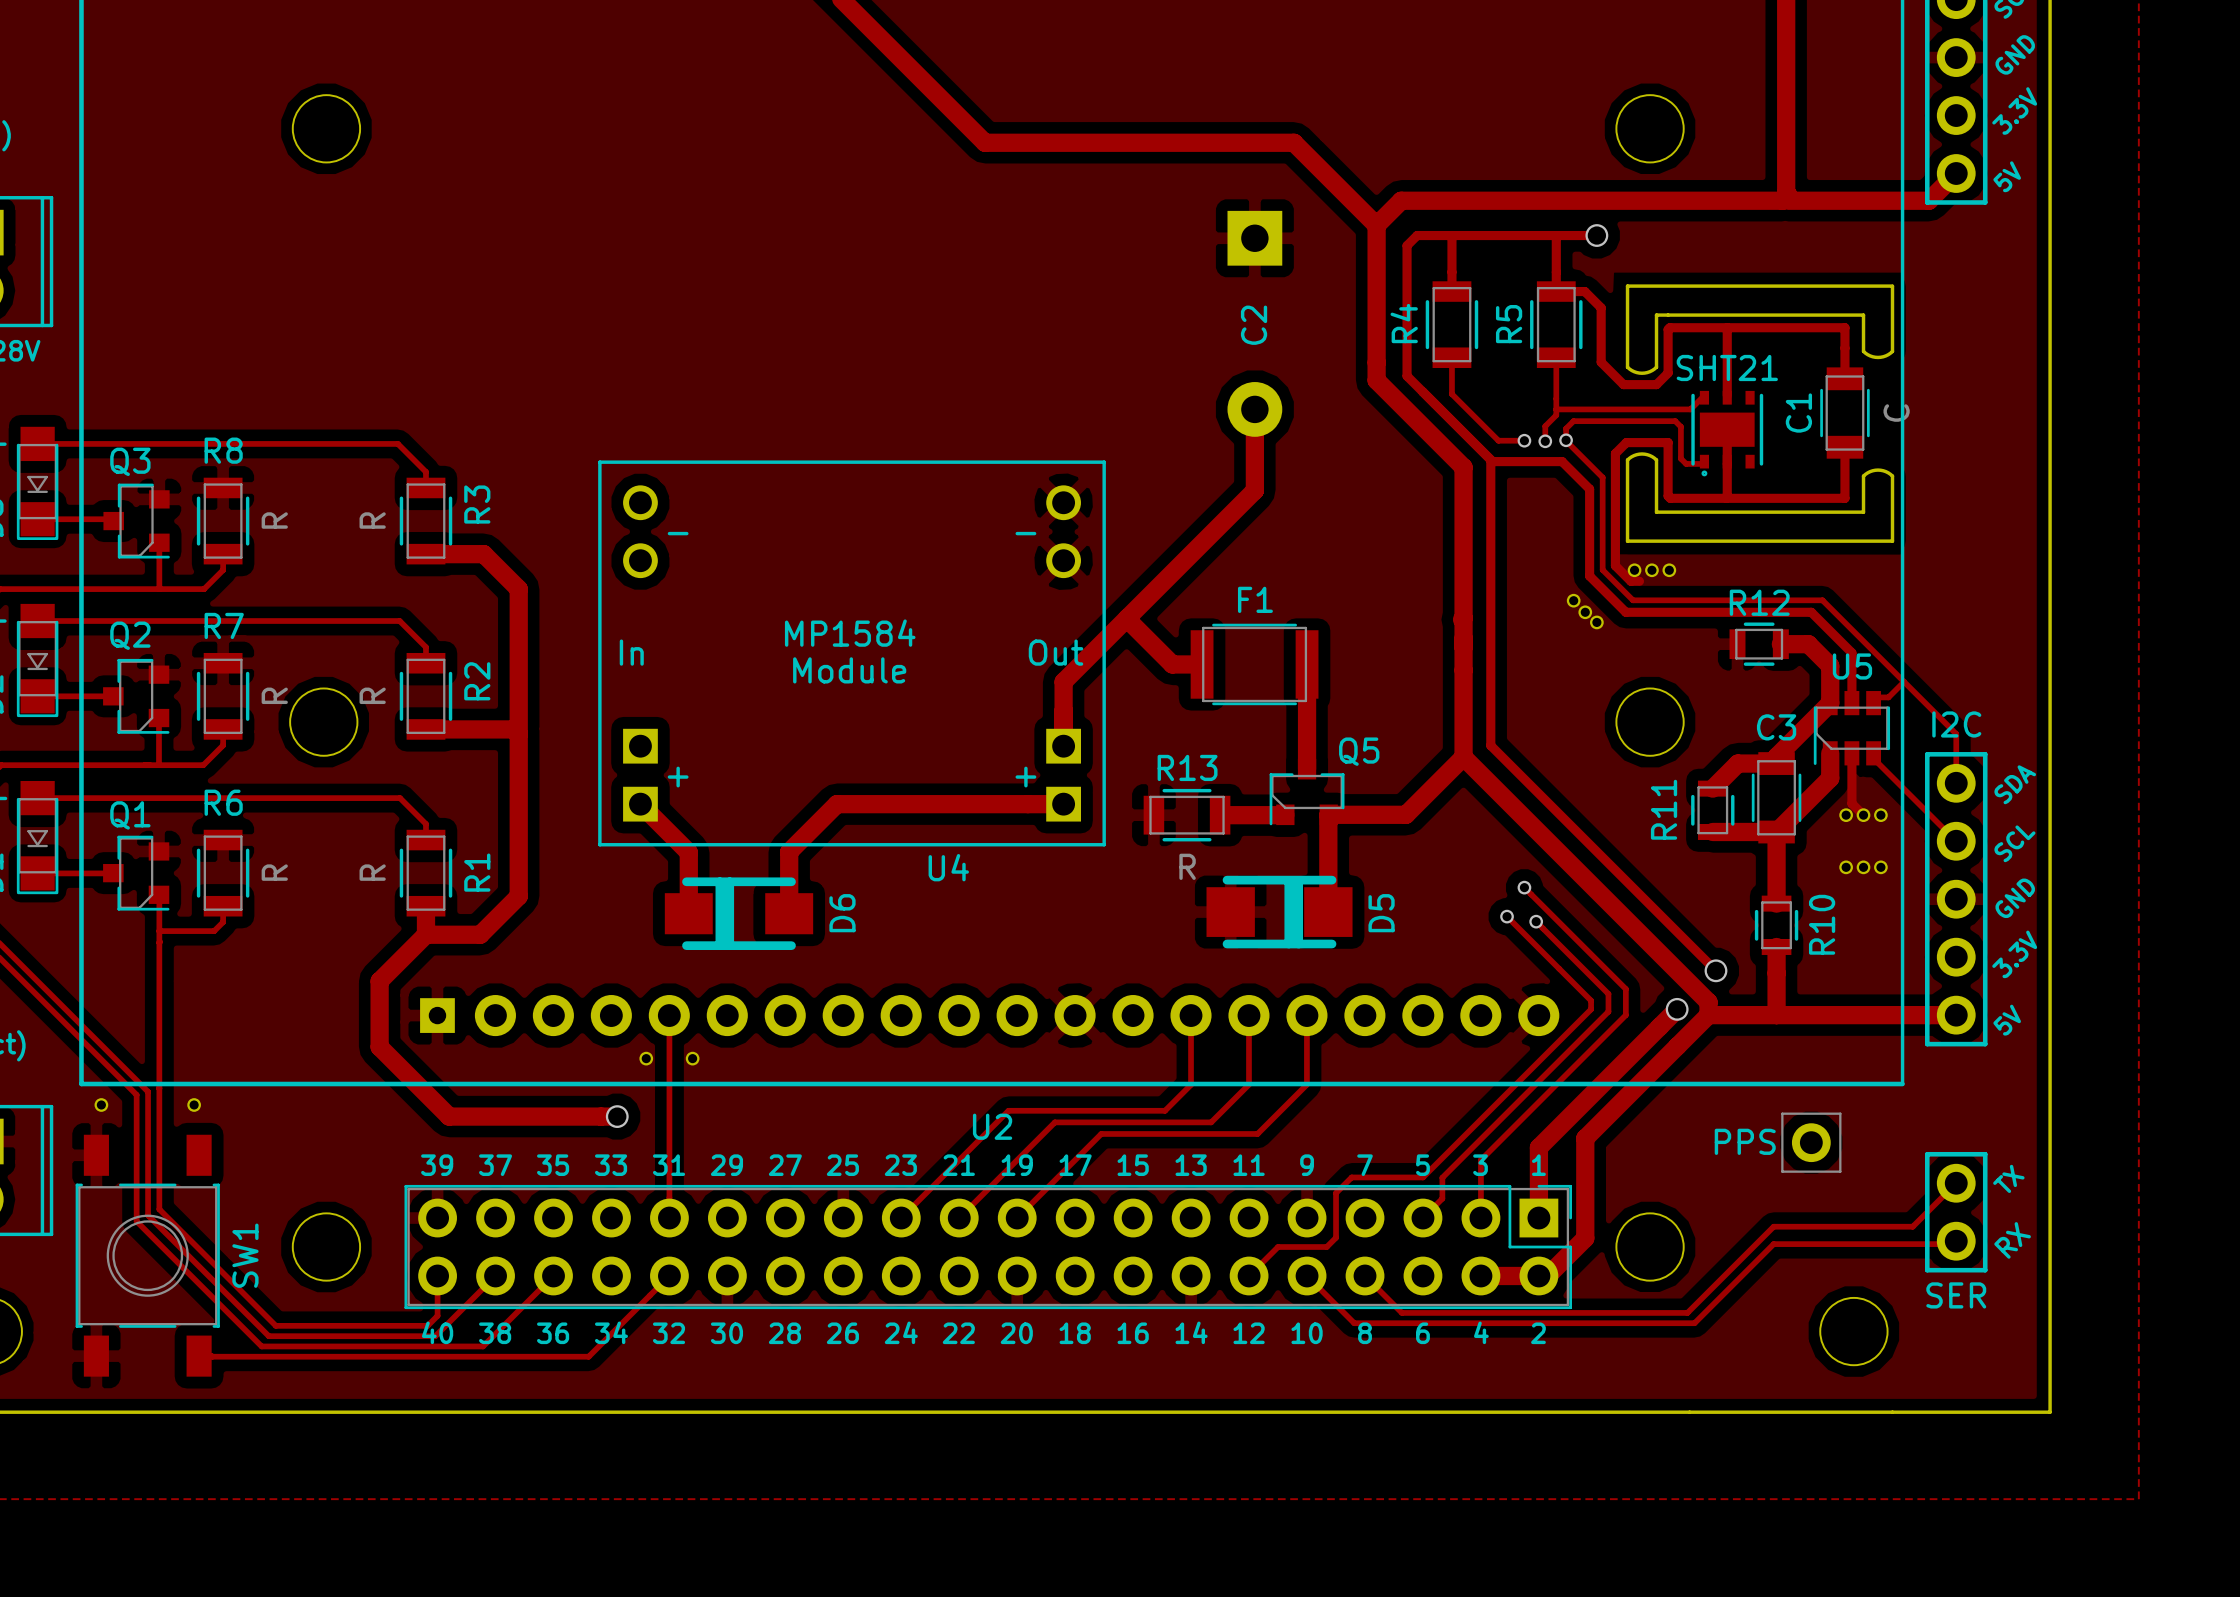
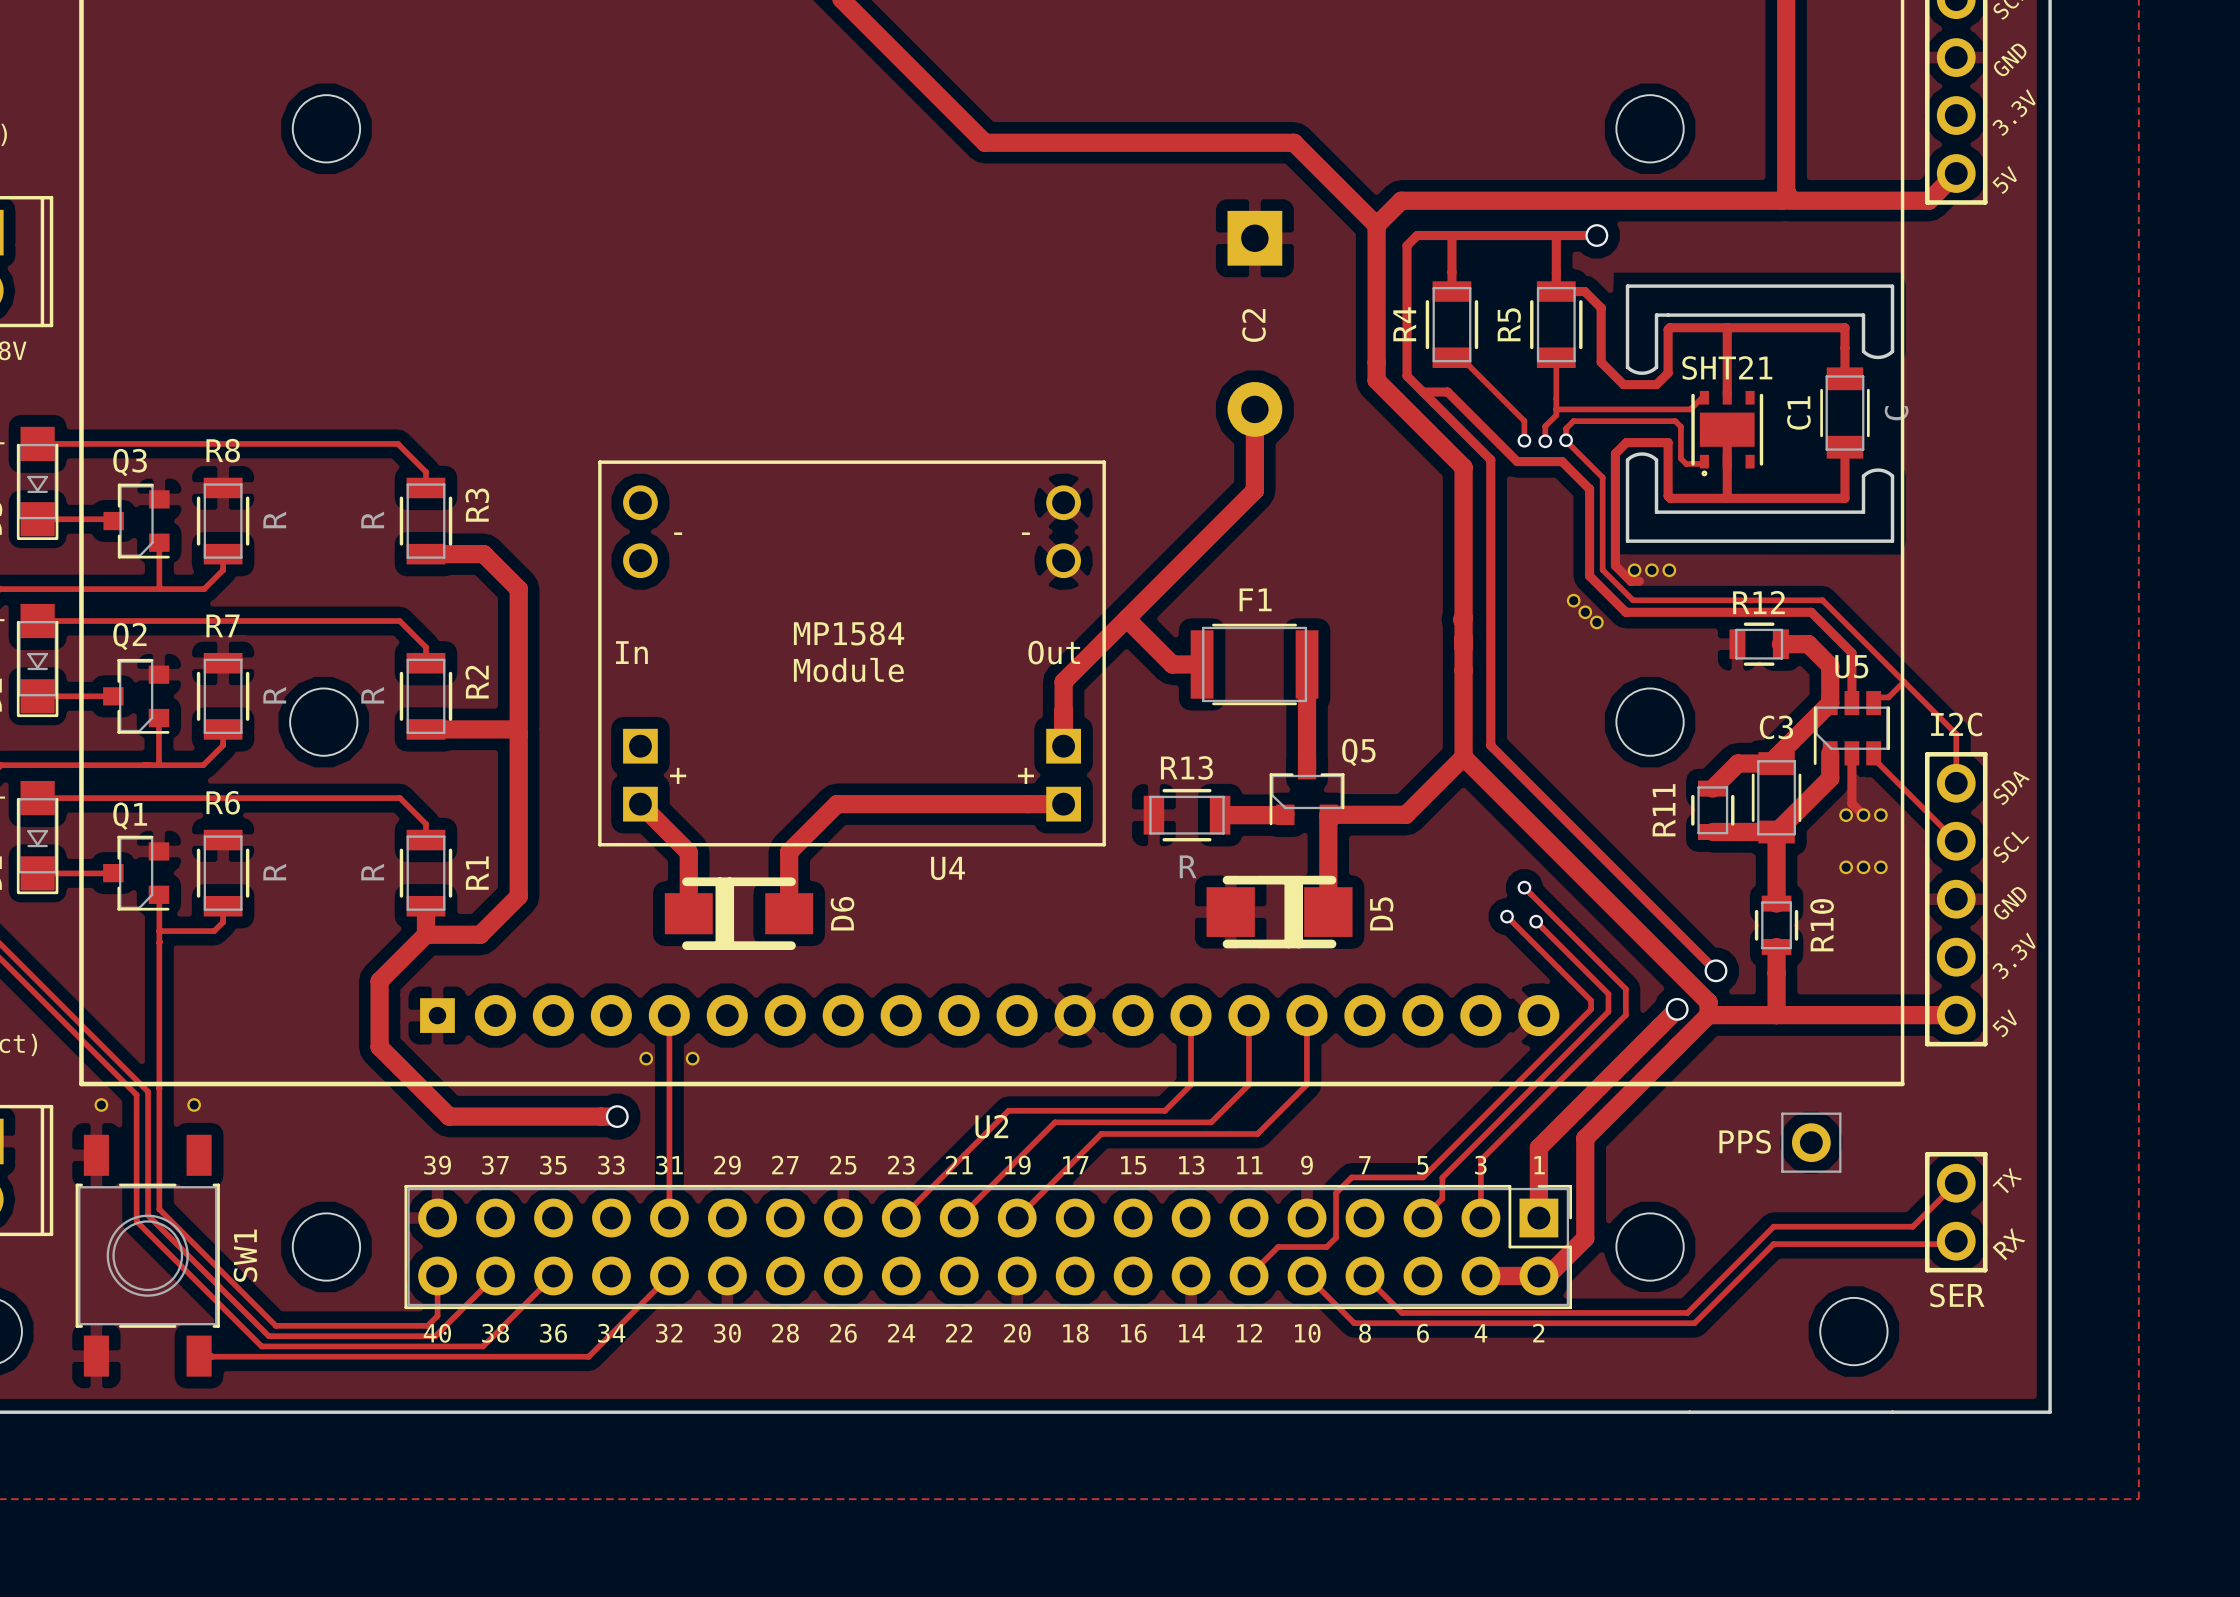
track: (1451, 357) (1451, 394) (1498, 440) (1523, 440) -> (1451, 357) (1461, 357) (1524, 421) (1524, 440)
track: (1490, 459) (1492, 461) (1517, 461) -> (1422, 392) (1447, 392) (1517, 461)

